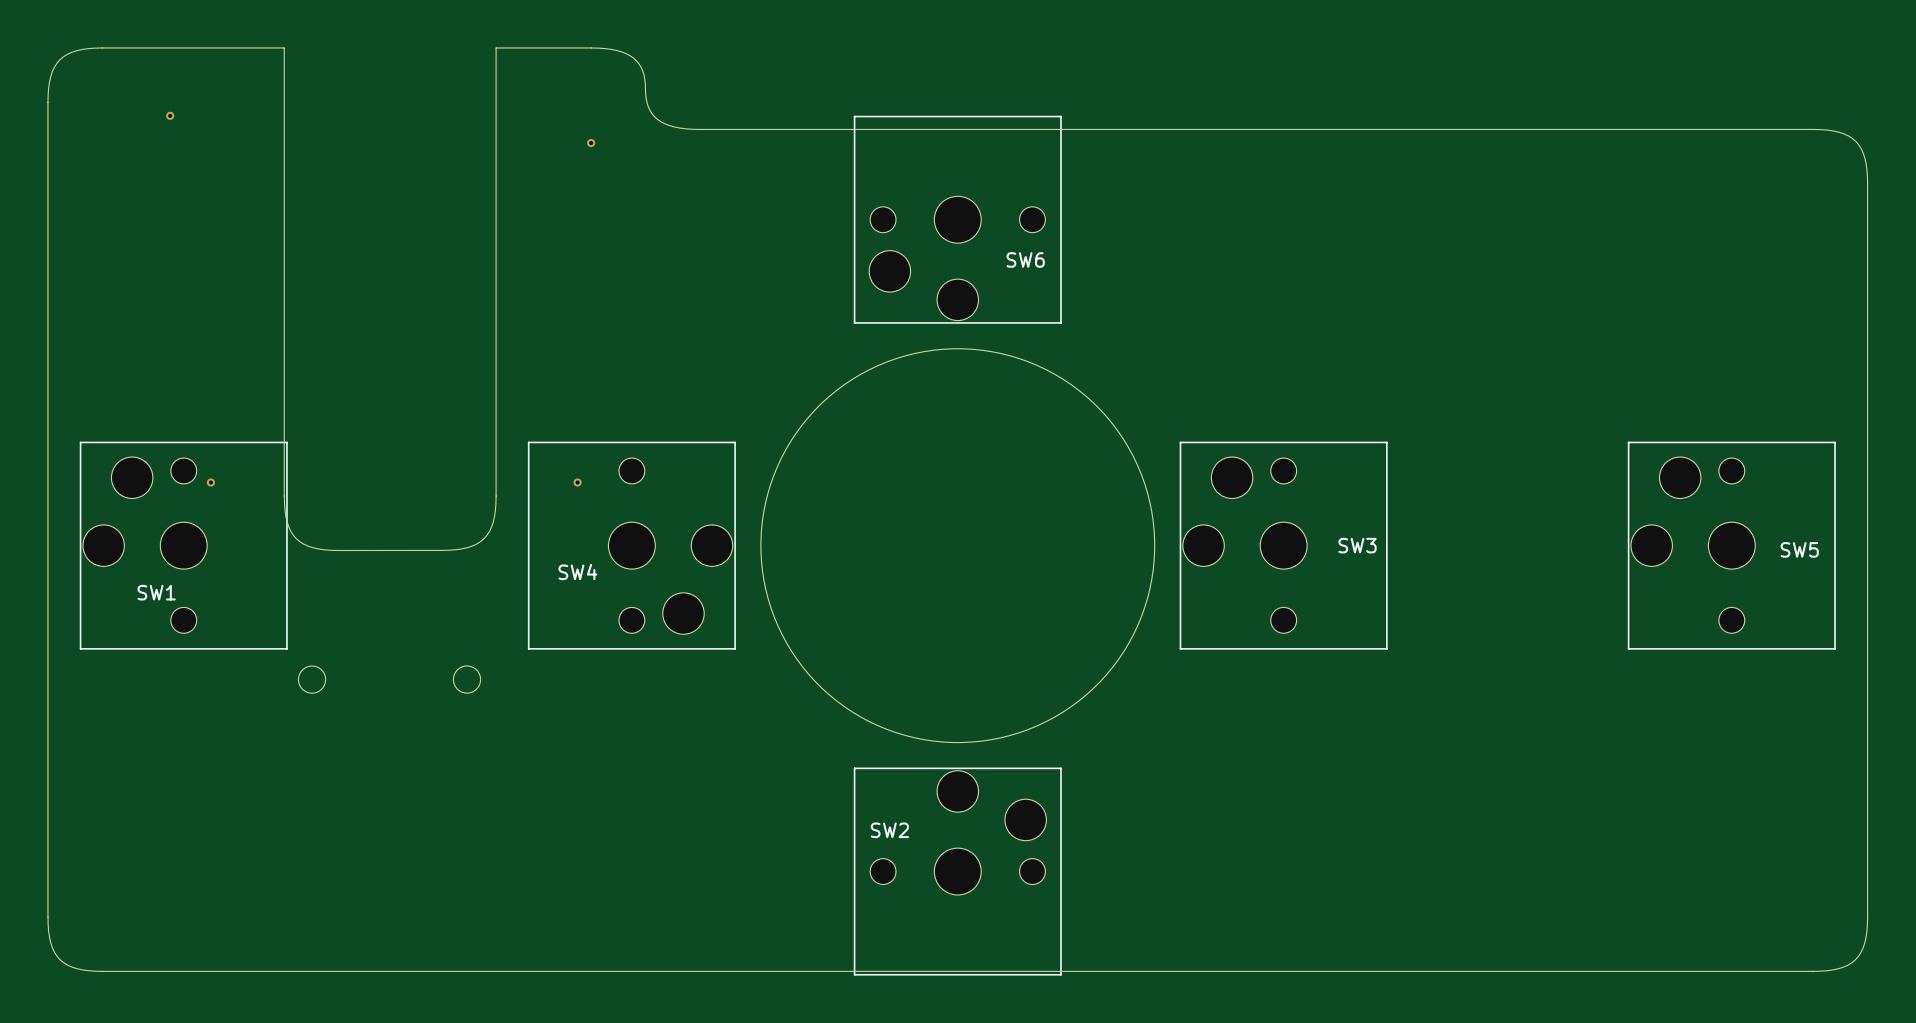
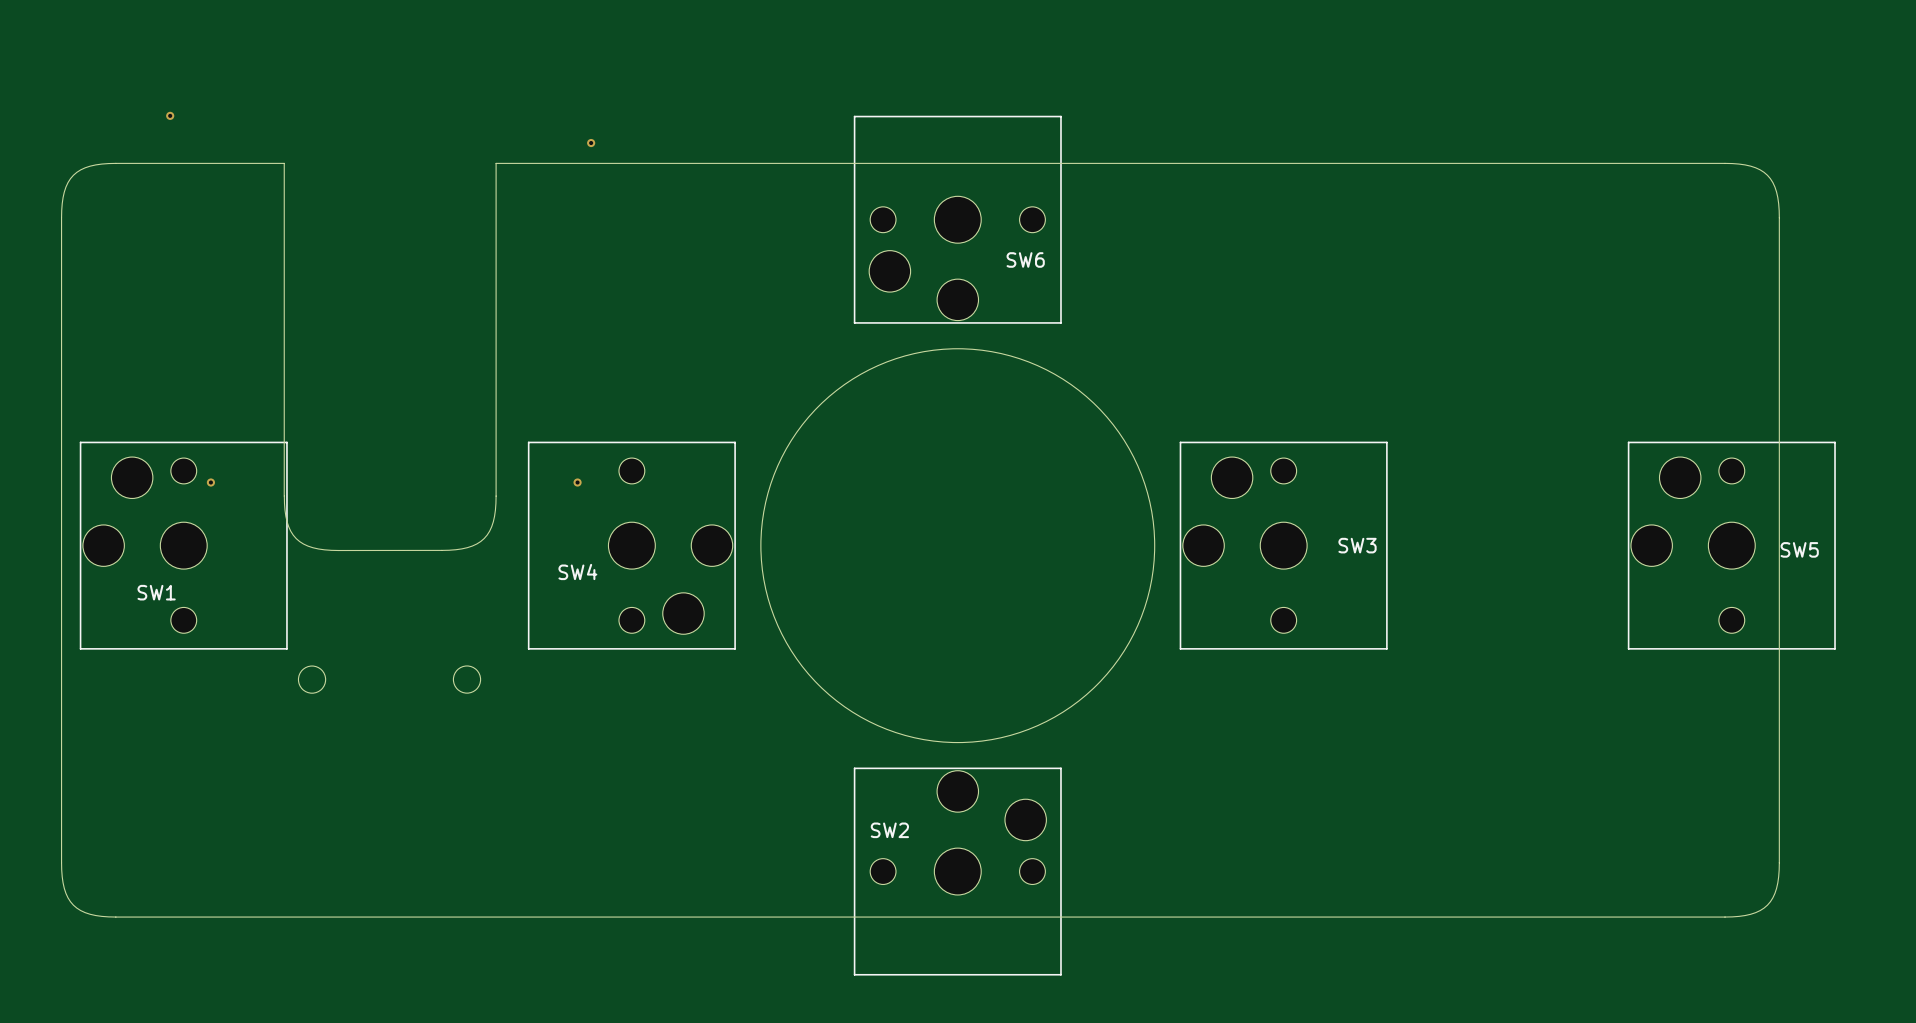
board edge: (284, 163) (284, 47) (88, 48) (71, 52) (63, 56) (52, 71) (47, 102) (47, 917) (52, 947) (59, 959) (67, 964) (82, 969) (102, 971) (1813, 971) (1843, 966) (1855, 959) (1861, 952) (1866, 937) (1867, 917) (1867, 183) (1863, 153) (1855, 141) (1848, 135) (1833, 130) (1813, 129) (692, 129) (669, 125) (654, 116) (646, 102) (644, 79) (641, 67) (633, 58) (626, 53) (598, 48) (496, 47) (496, 163) -> (284, 163) (101, 164) (85, 167) (76, 172) (70, 178) (64, 192) (61, 217) (61, 870) (64, 888) (67, 897) (80, 910) (95, 915) (115, 917) (1725, 917) (1755, 912) (1767, 905) (1772, 897) (1777, 882) (1779, 862) (1779, 217) (1774, 187) (1767, 175) (1760, 169) (1745, 164) (1725, 163) (496, 163)

